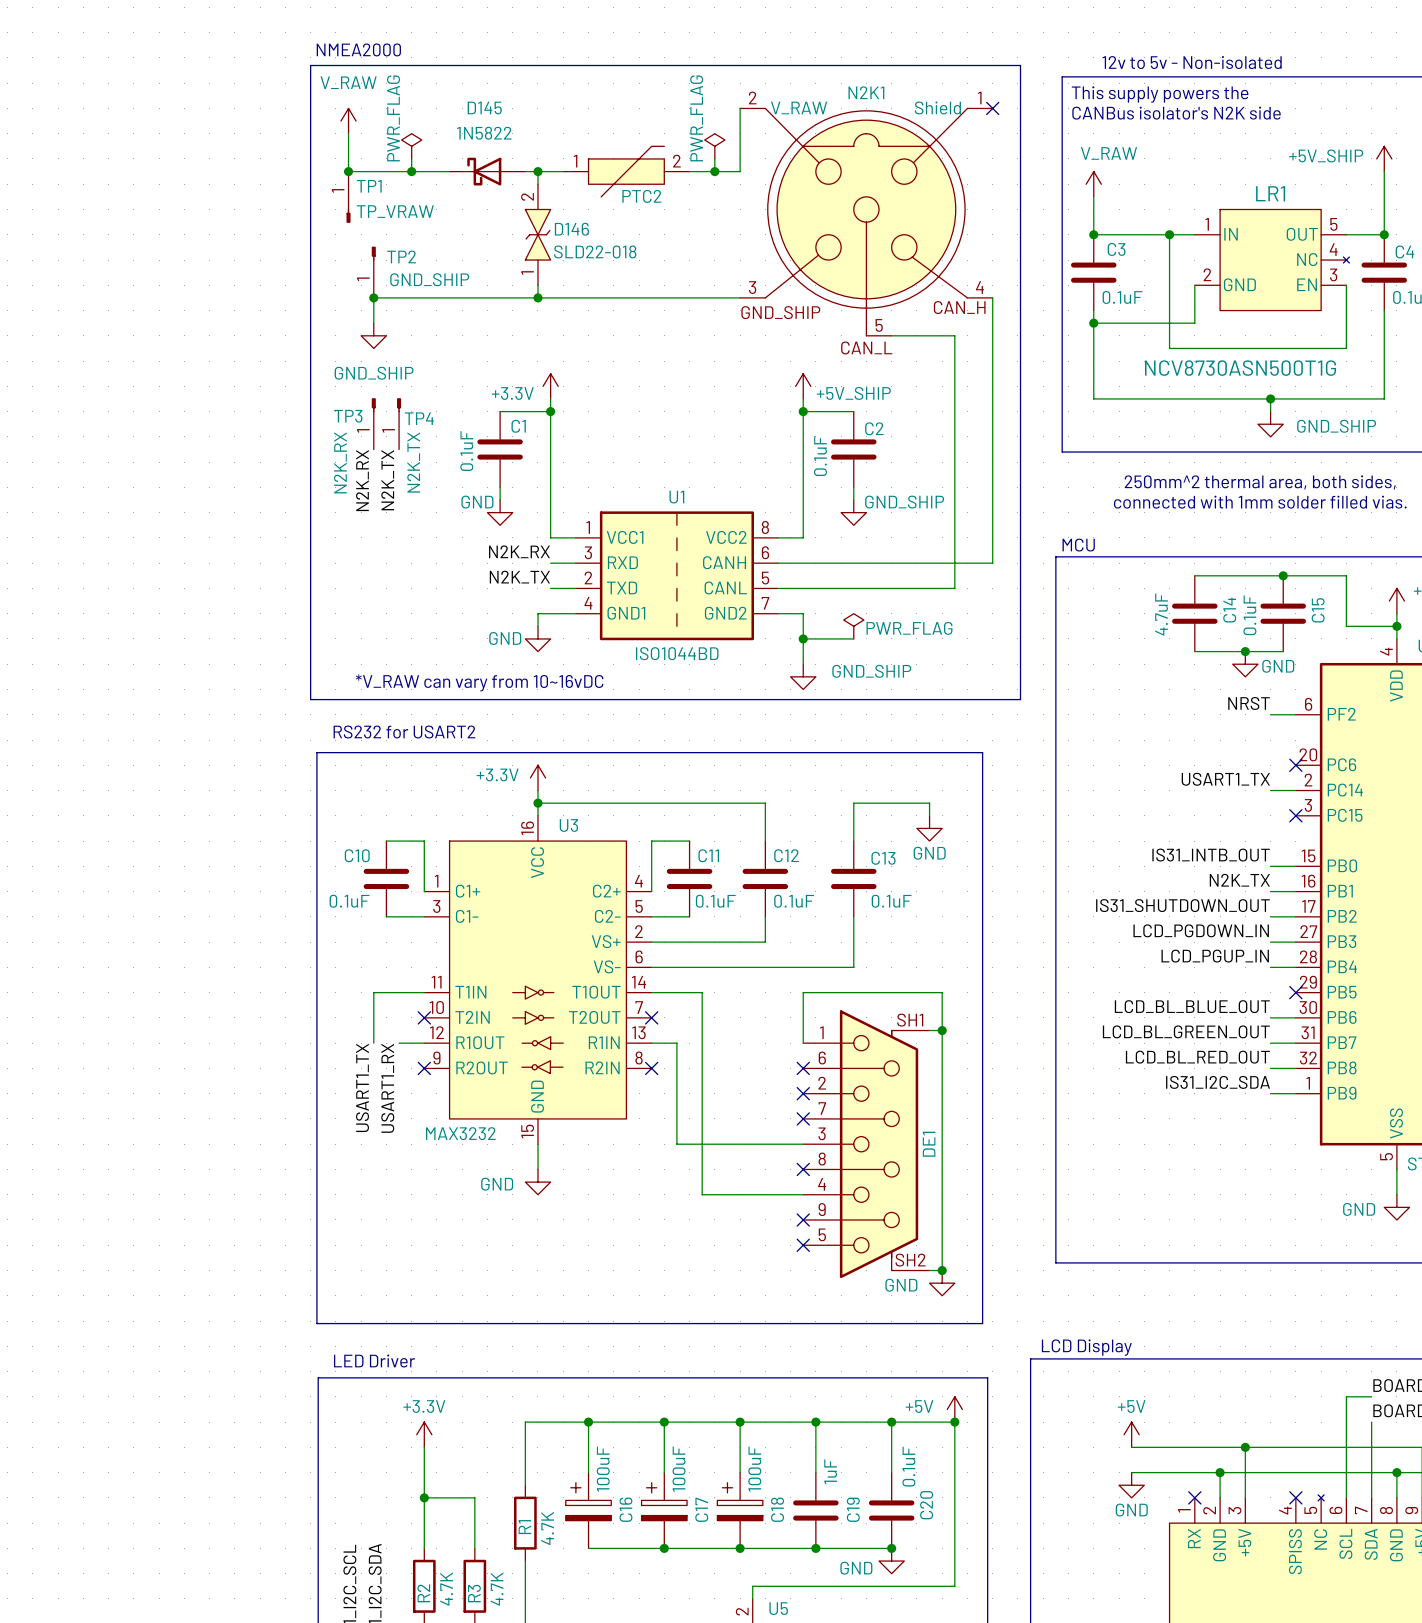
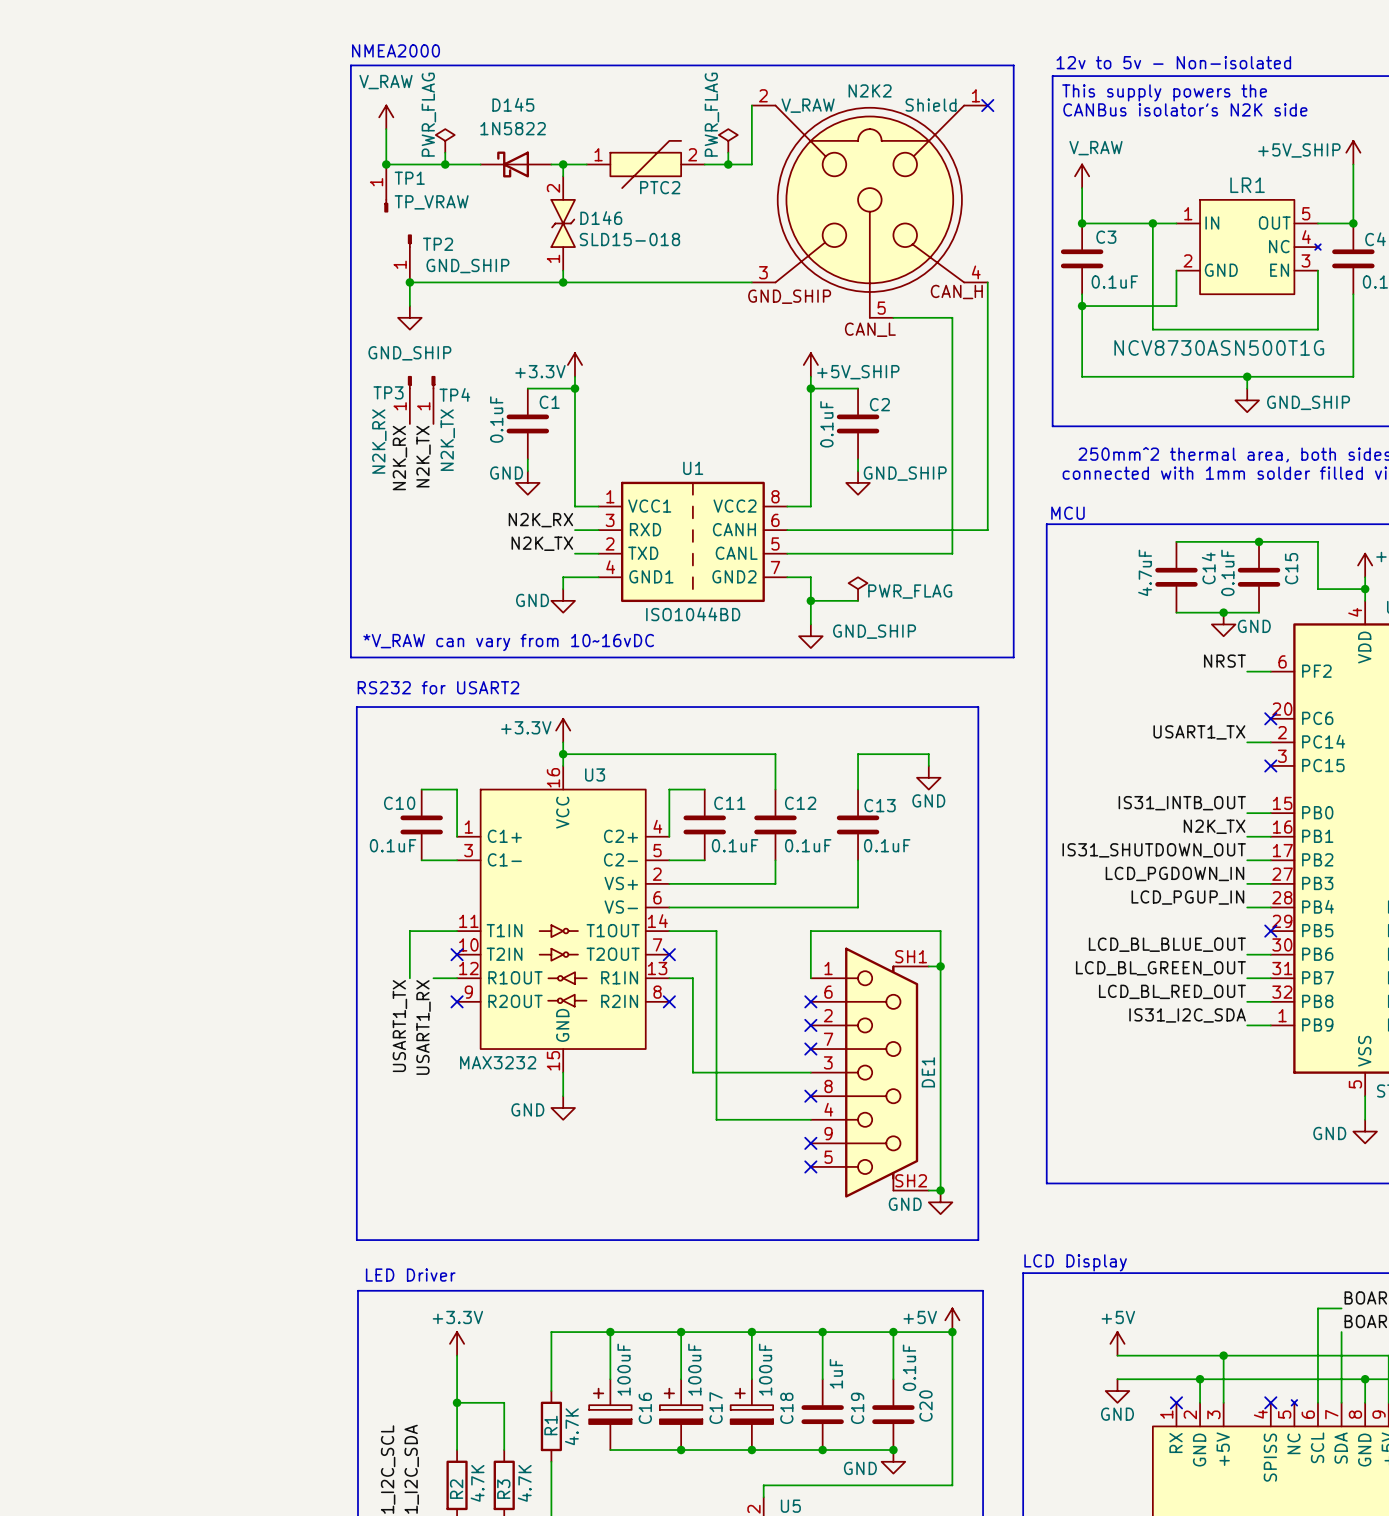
N2K1 name: N2K1 (866, 92) -> N2K2 (870, 90)
D146 value: SLD22-018 (595, 251) -> SLD15-018 (629, 239)

